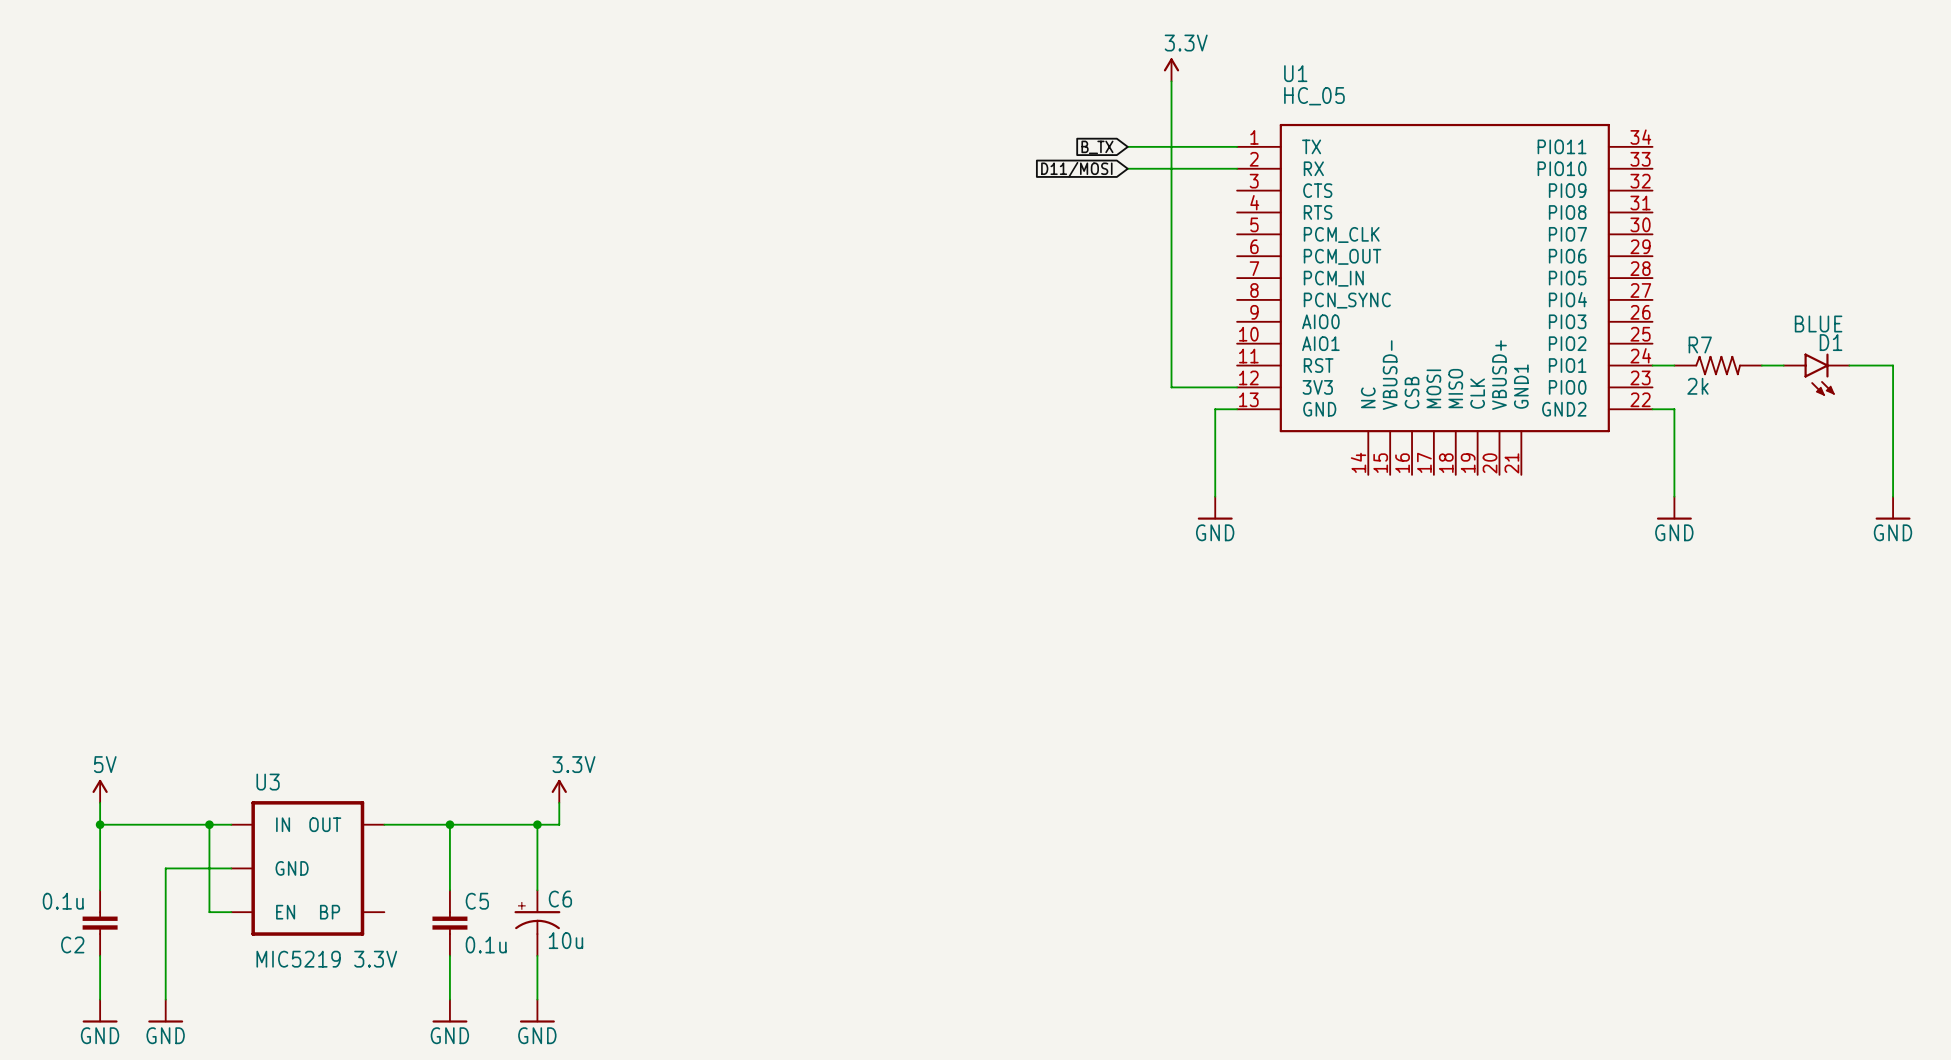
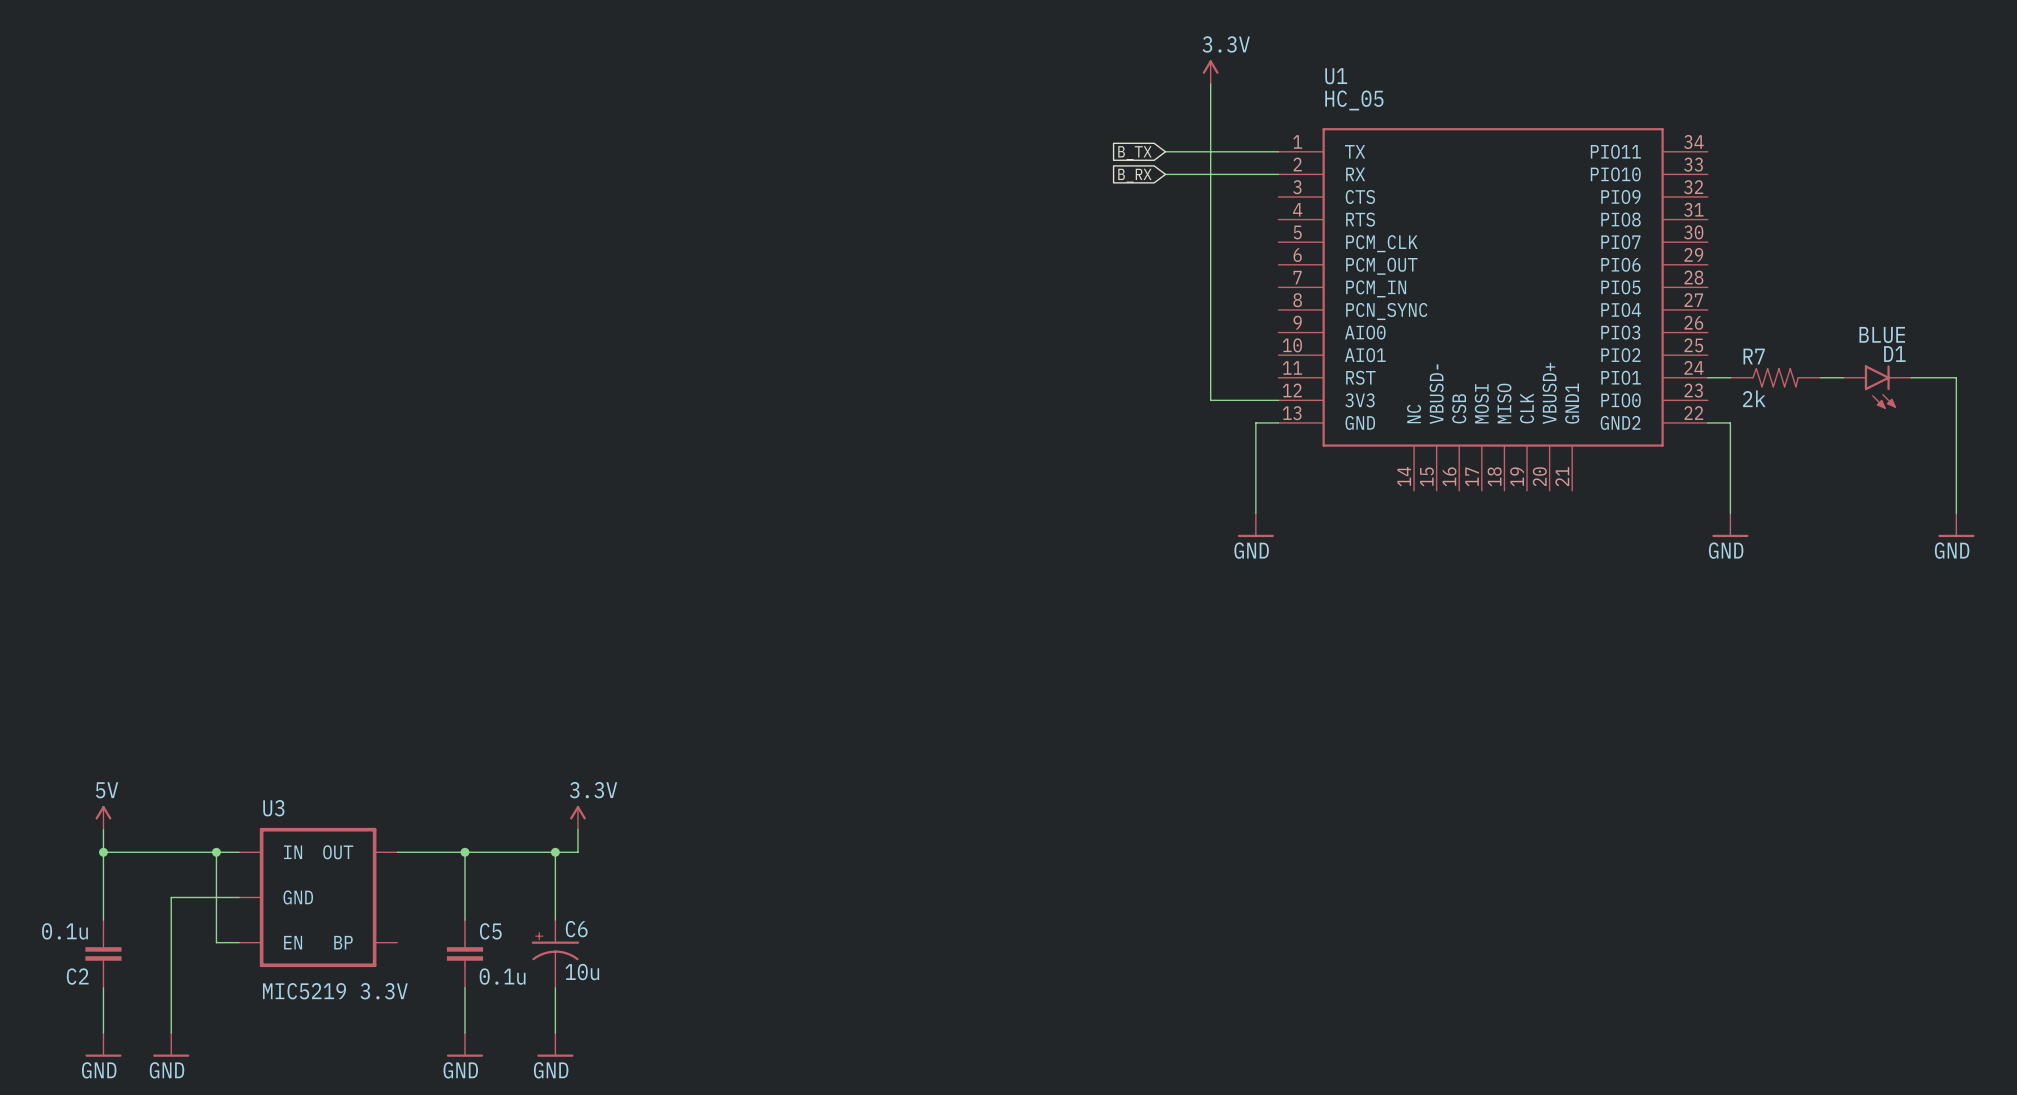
global label: D11/MOSI (1076, 169) -> B_RX (1134, 175)

